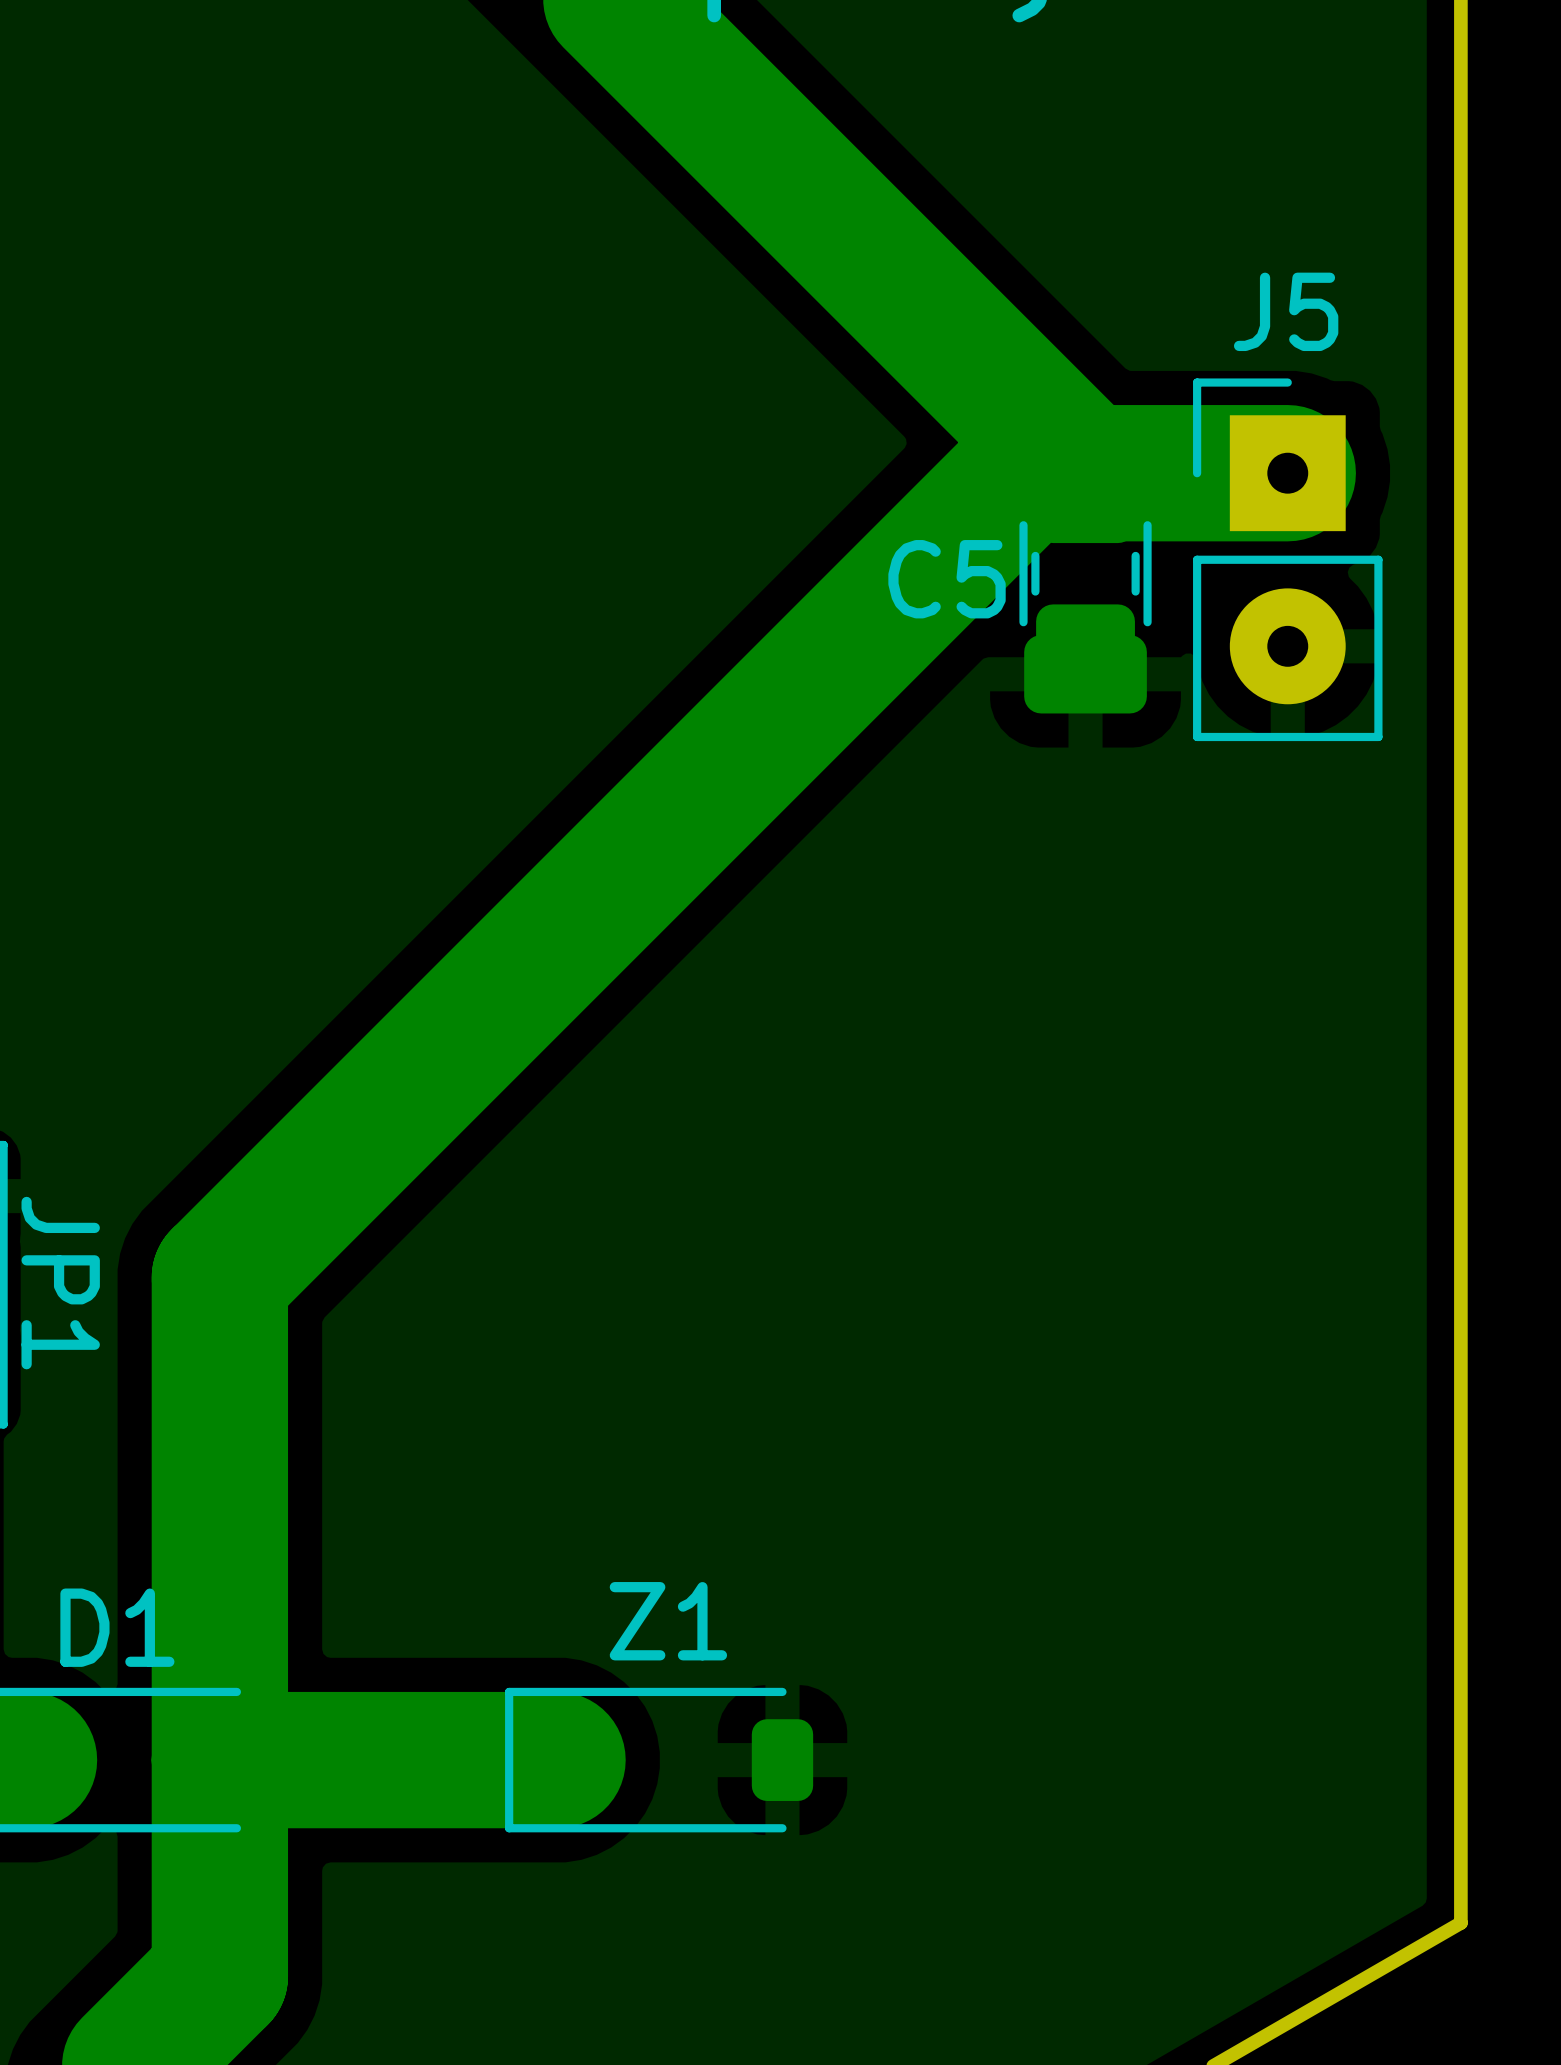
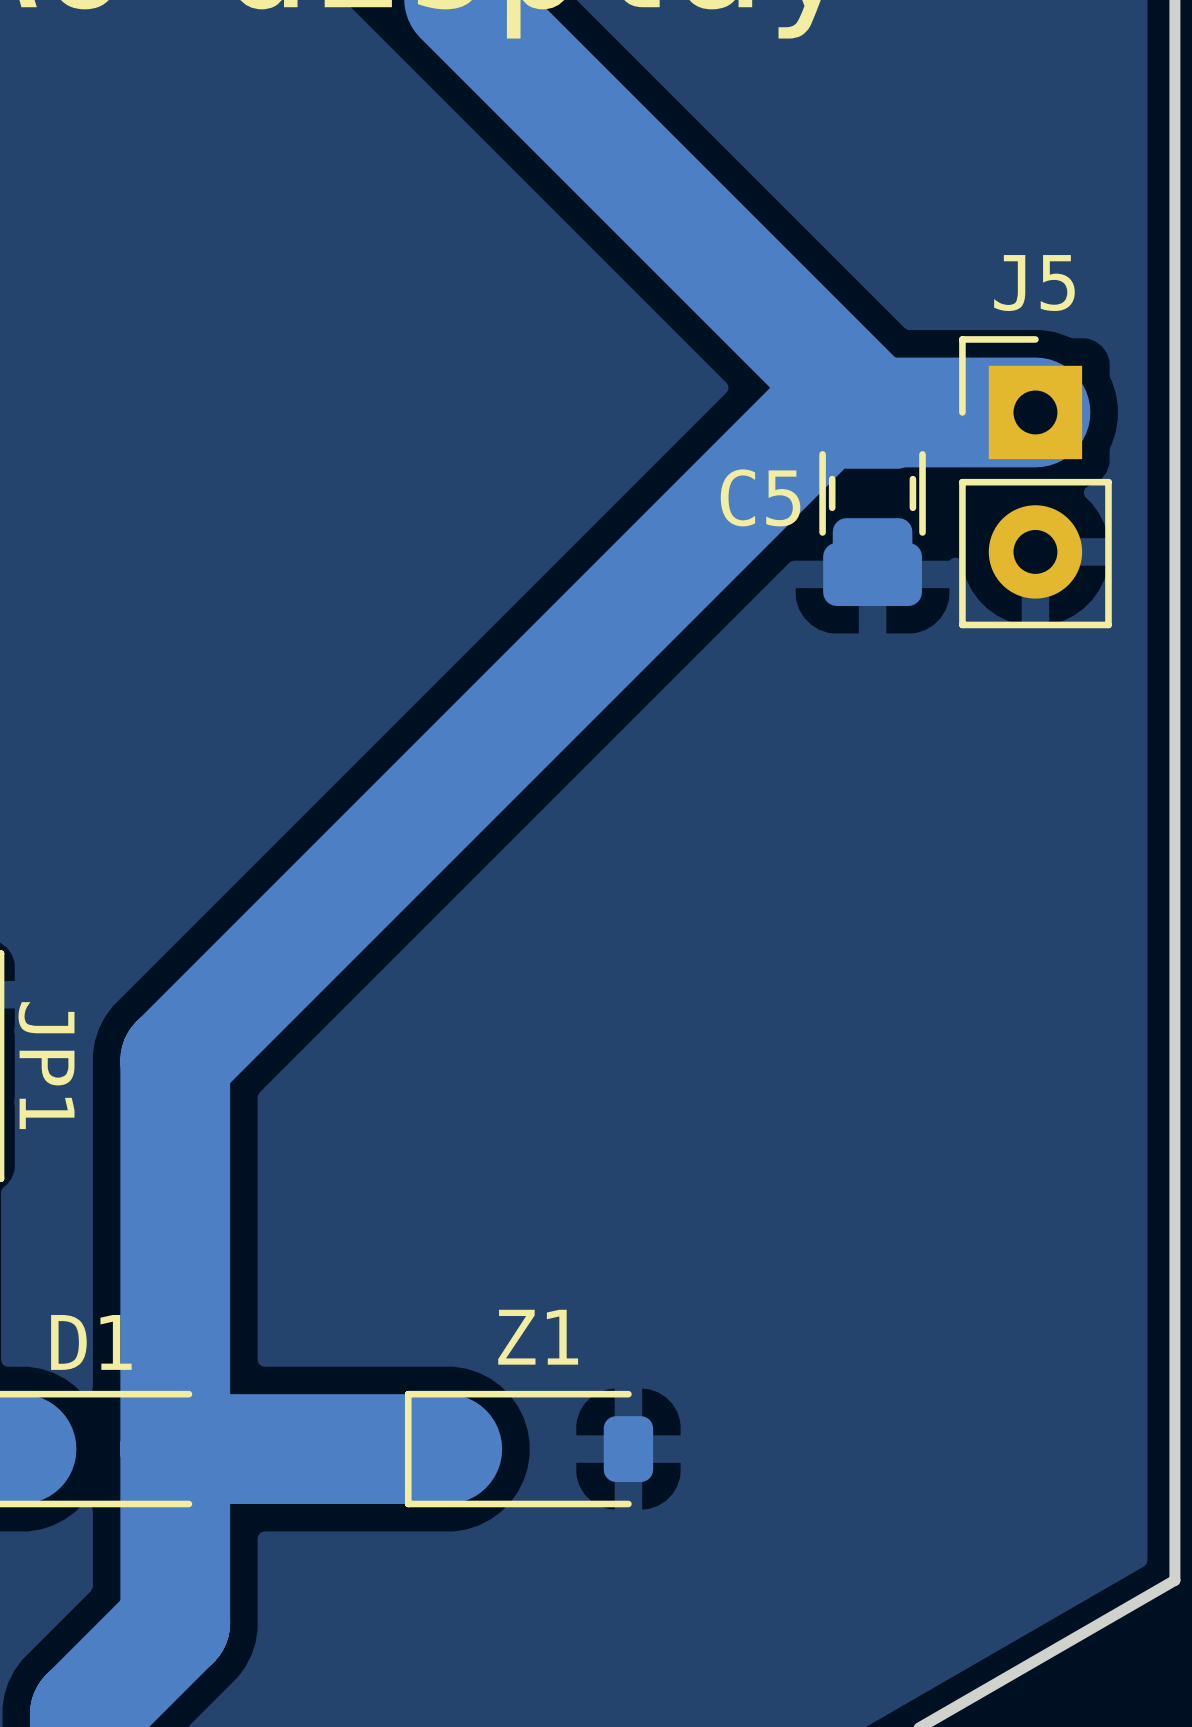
J5 footprint: [1193, 378, 1383, 742] -> [959, 336, 1112, 629]

